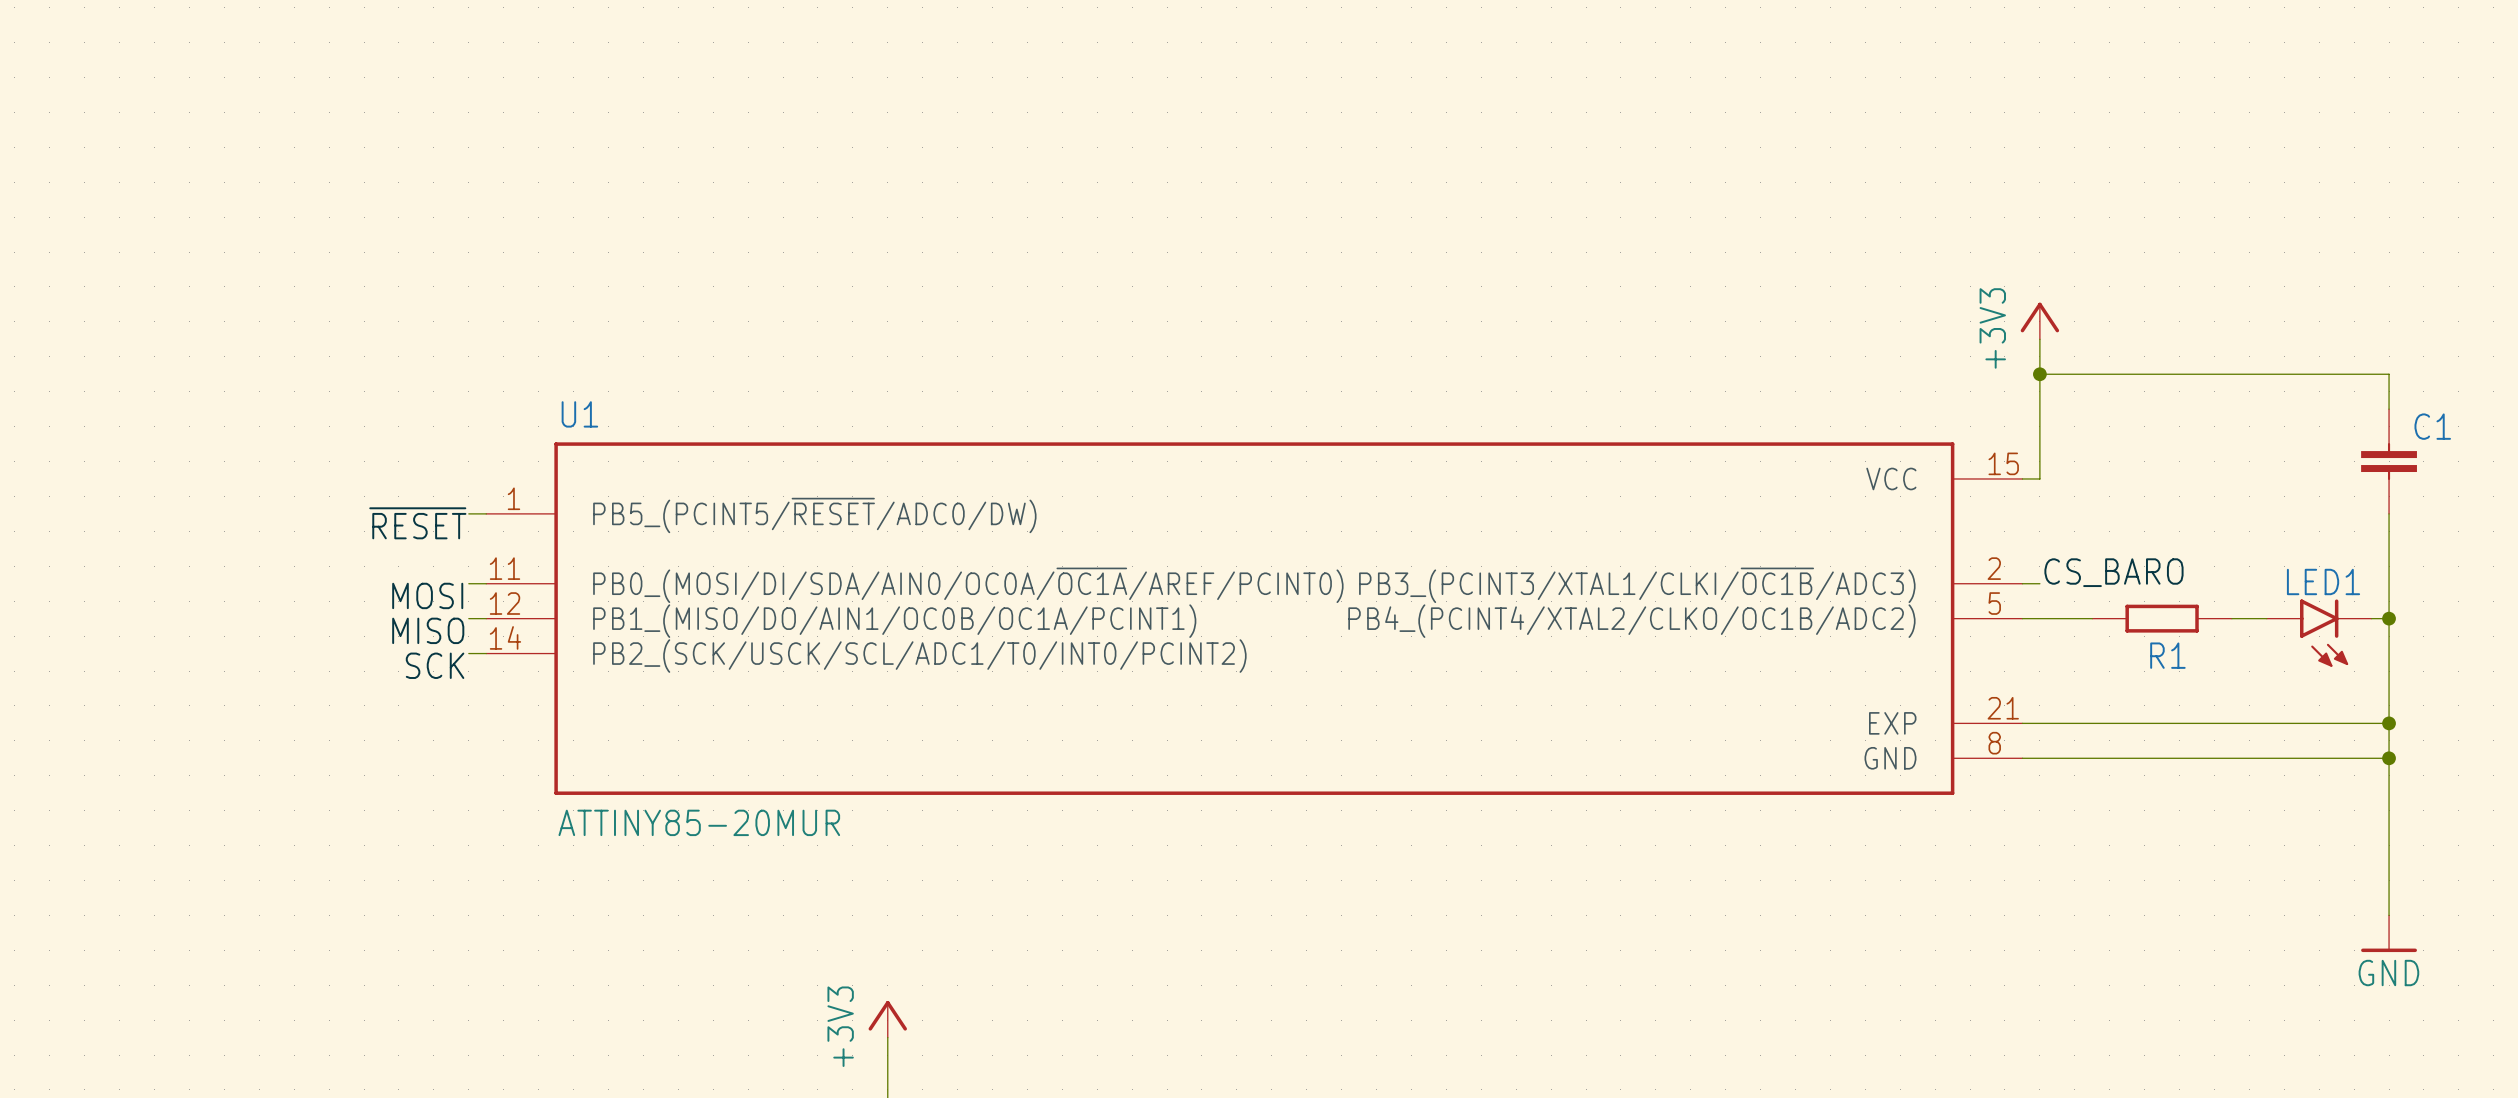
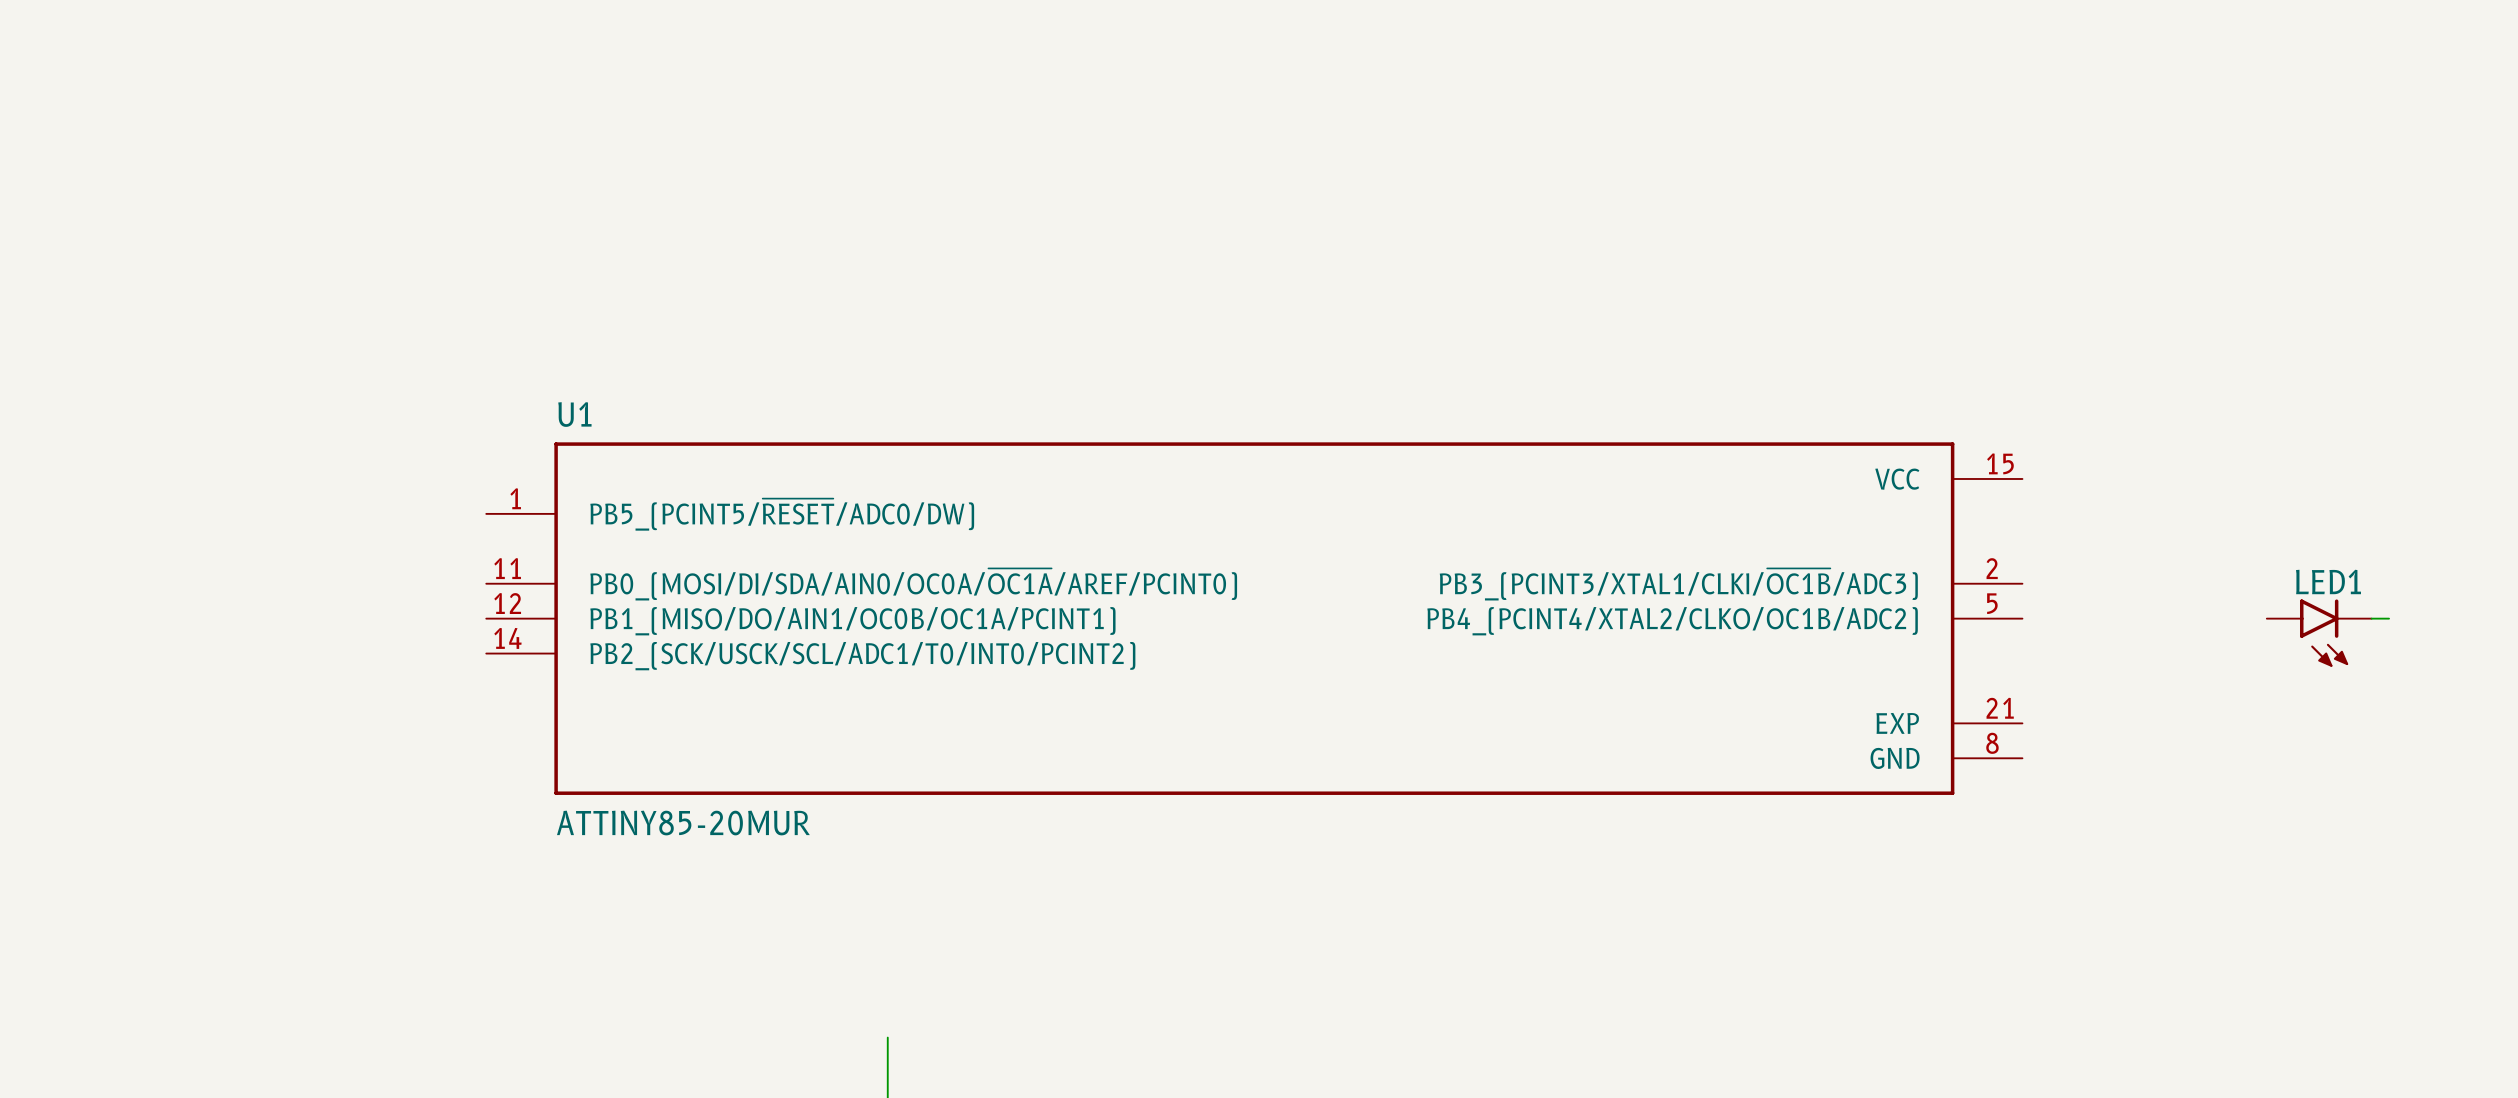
power symbol: +3V3 (2039, 321) -> none
wire: (2039, 339) (2039, 478) (2022, 478) -> none
wire: (2039, 374) (2389, 374) (2389, 409) -> none
junction: (2039, 374) -> none
C1: (2389, 461) -> none
wire: (468, 513) (486, 513) -> none
wire: (2389, 513) (2389, 915) -> none
label: ~{RESET} (417, 523) -> none
label: CS_BARO (2113, 572) -> none
wire: (468, 583) (486, 583) -> none
wire: (2022, 583) (2039, 583) -> none
label: MOSI (427, 595) -> none
wire: (468, 618) (486, 618) -> none
wire: (2022, 618) (2092, 618) -> none
R1: (2162, 618) -> none
wire: (2231, 618) (2266, 618) -> none
junction: (2389, 618) -> none
label: MISO (428, 630) -> none
wire: (468, 653) (486, 653) -> none
label: SCK (435, 665) -> none
wire: (2022, 723) (2389, 723) -> none
junction: (2389, 723) -> none
wire: (2022, 758) (2389, 758) -> none
junction: (2389, 758) -> none
power symbol: GND (2389, 933) -> none
power symbol: +3V3 (887, 1019) -> none

